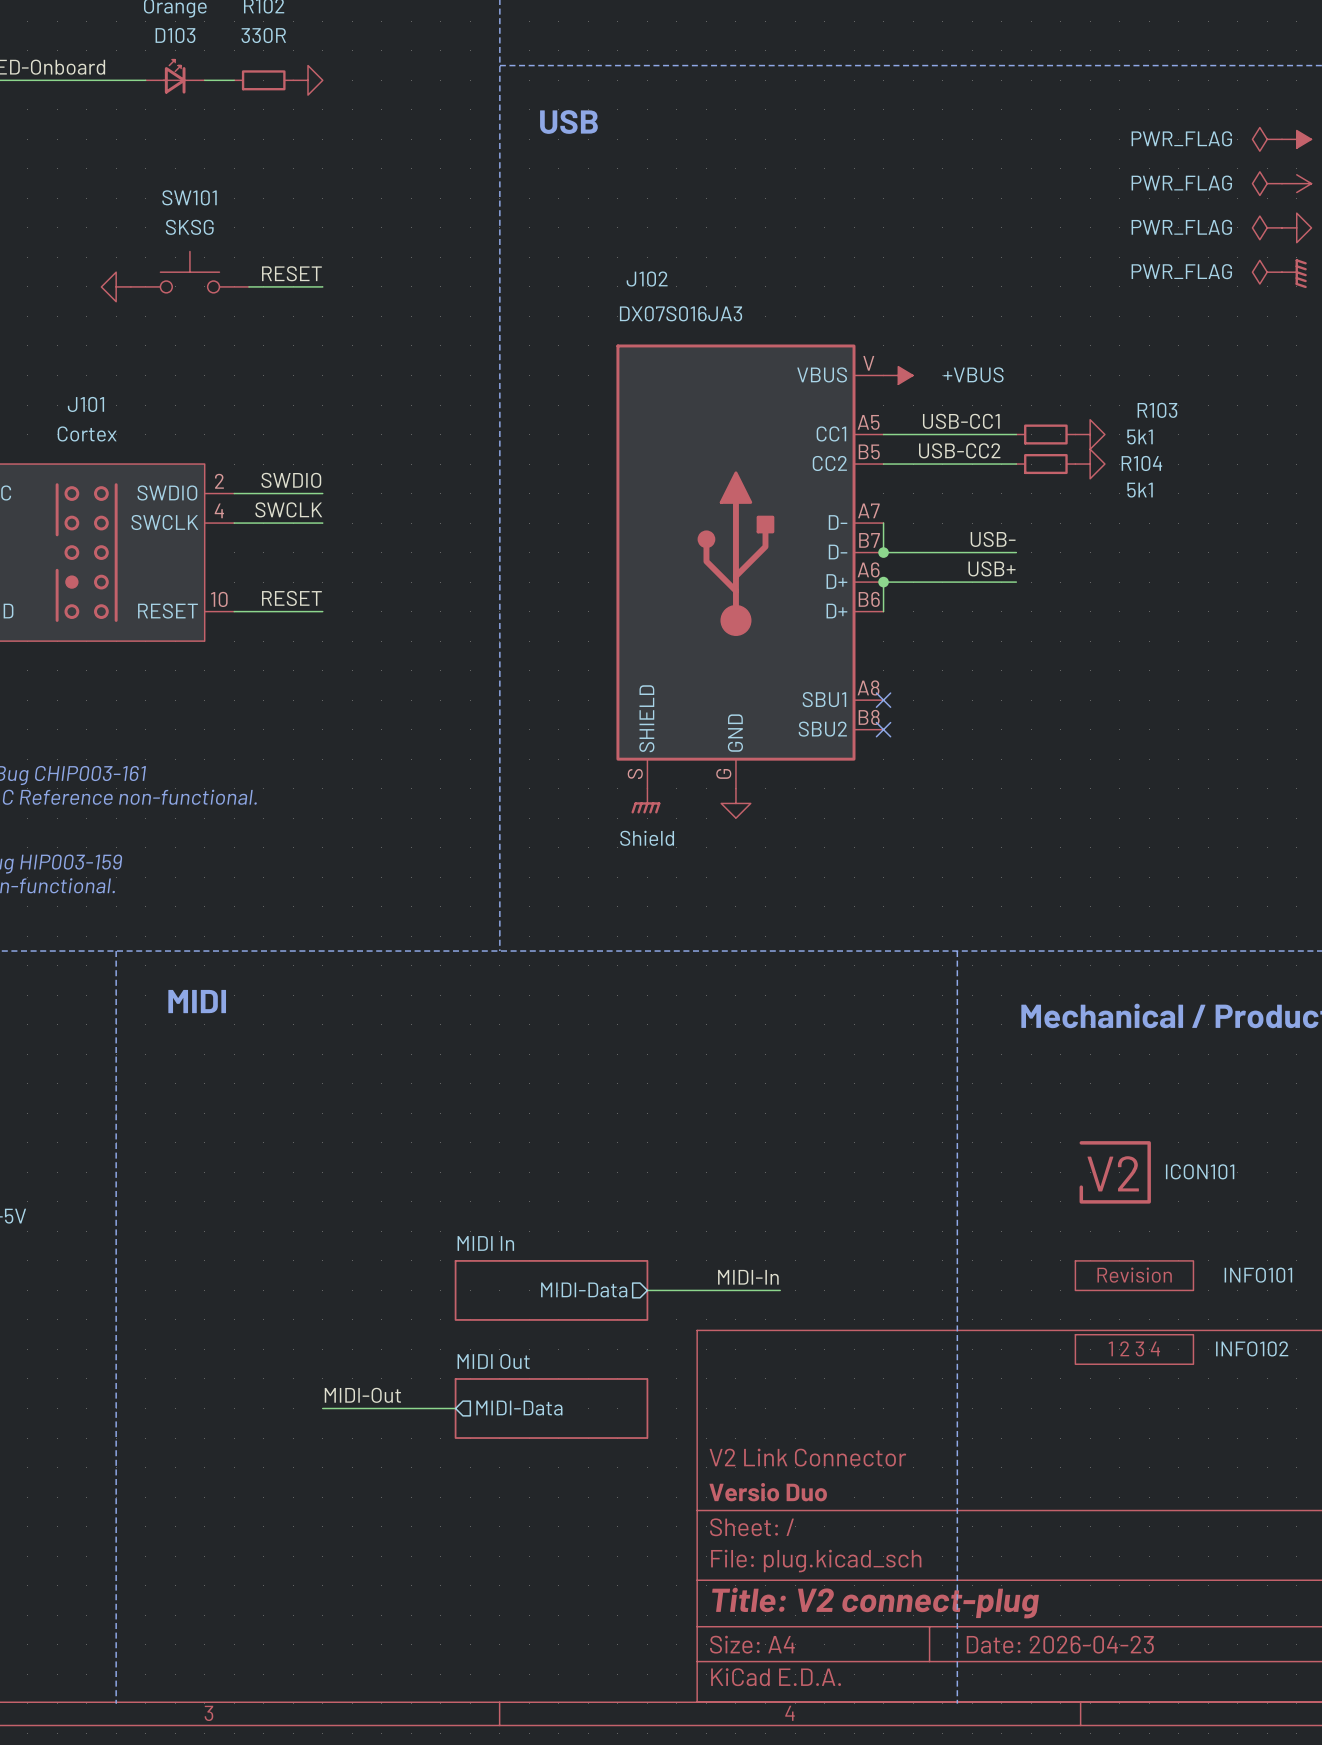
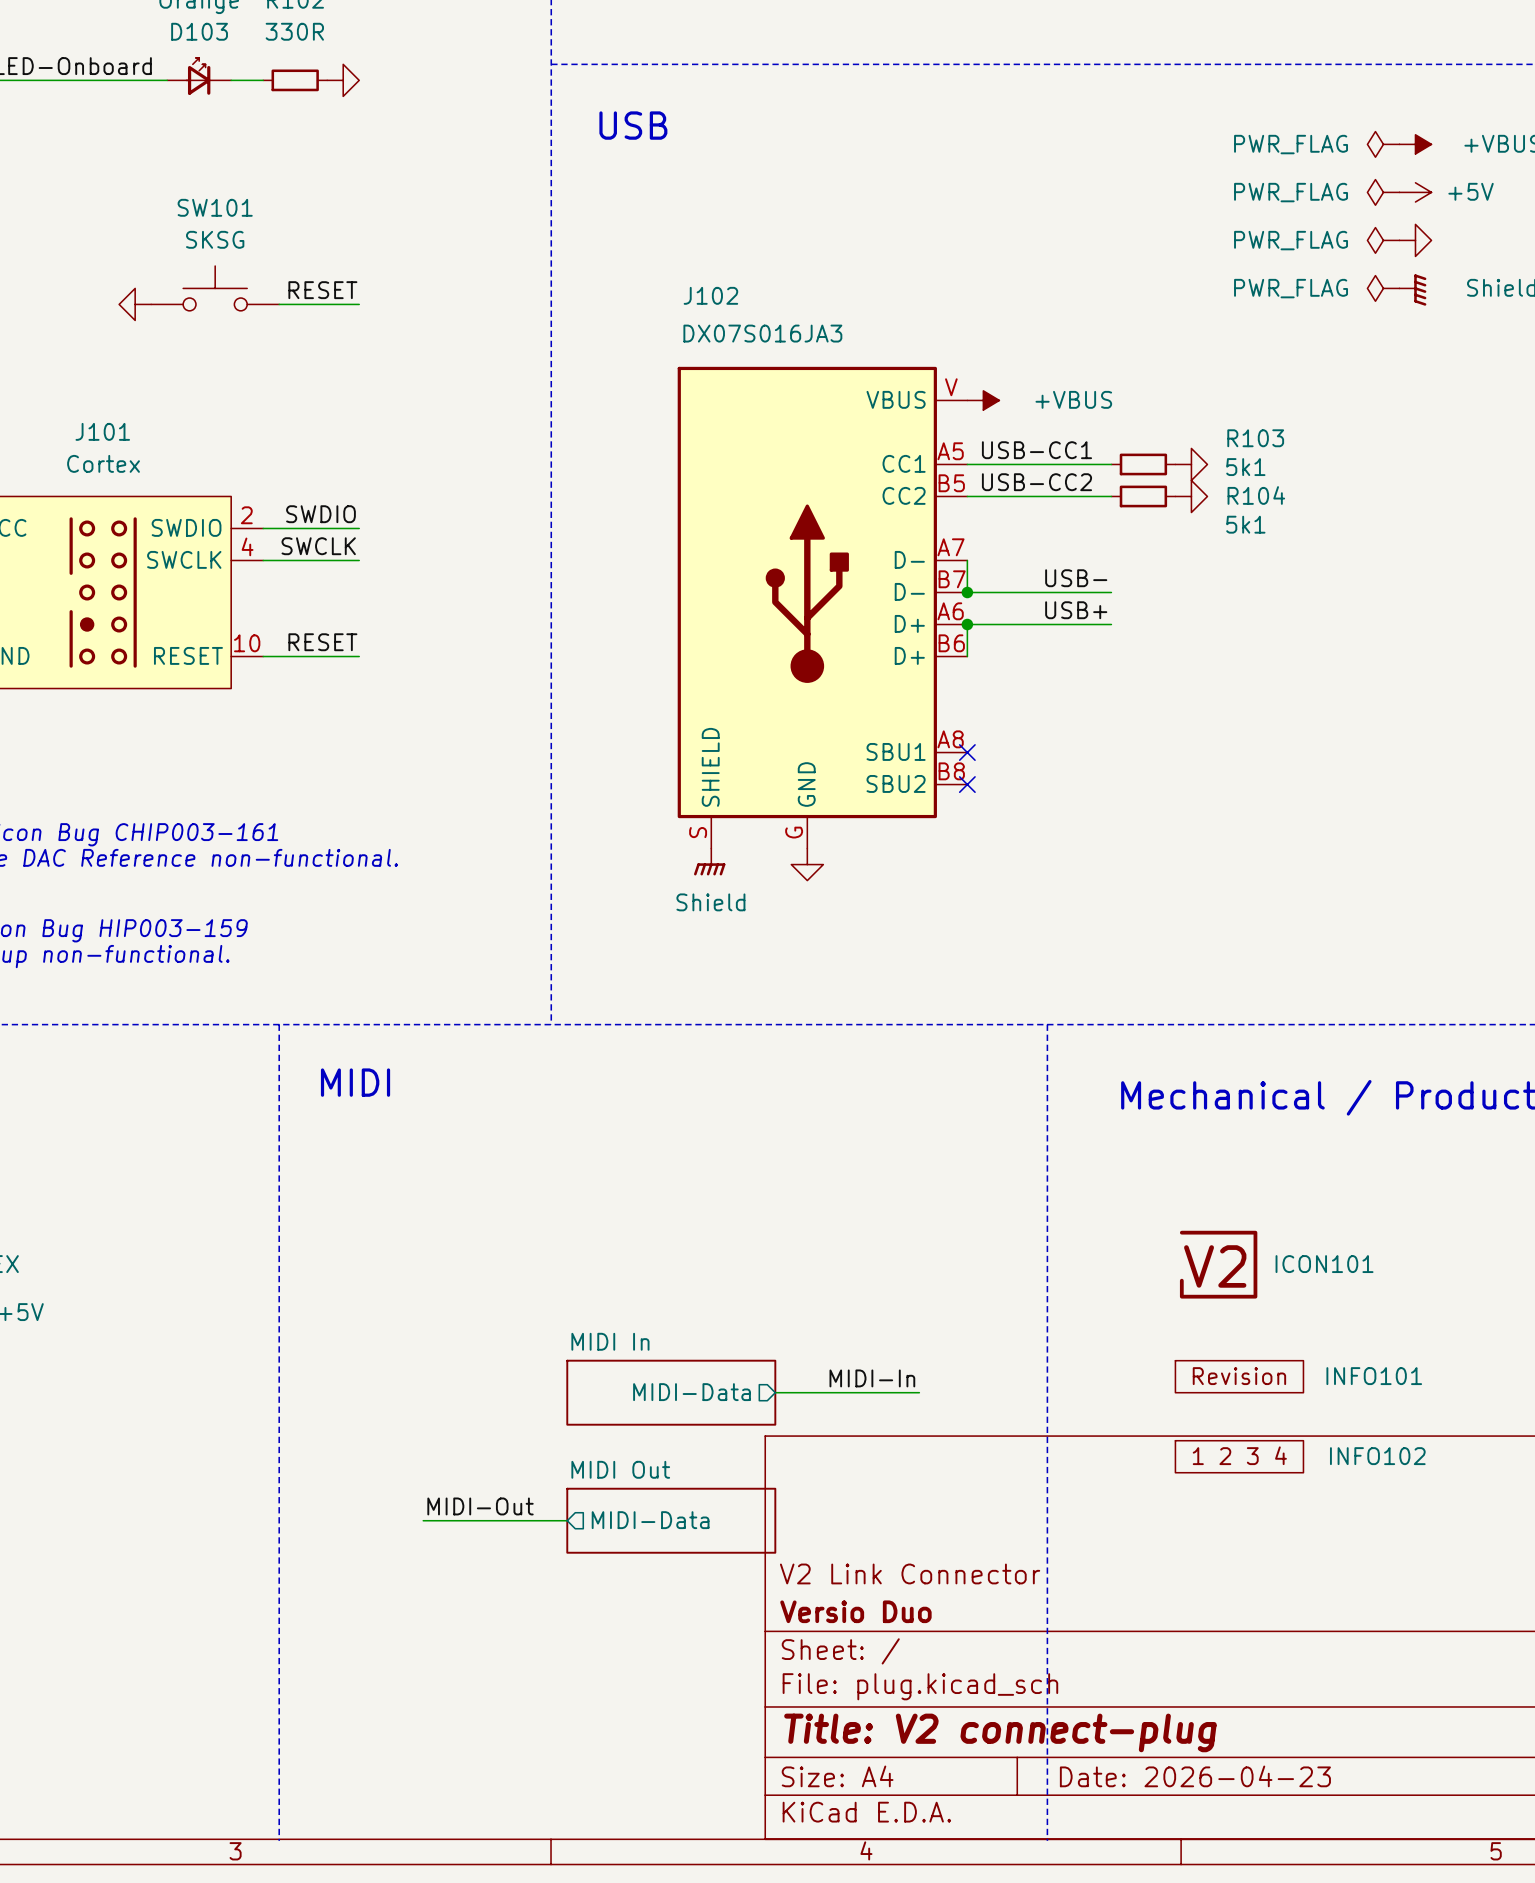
line: (116, 951) (116, 1703) -> (279, 1024) (279, 1840)
text position: MIDI (197, 1001) -> MIDI (355, 1082)
label position: MIDI-In (748, 1277) -> MIDI-In (872, 1378)
sheet pin position: MIDI-Data (584, 1289) -> MIDI-Data (692, 1392)
sheet MIDI In position: (551, 1290) -> (671, 1392)
wire: (647, 1290) (706, 1290) -> (855, 1392) (919, 1392)
label position: MIDI-Out (362, 1395) -> MIDI-Out (480, 1506)
wire: (322, 1408) (381, 1408) -> (503, 1520) (567, 1520)
sheet pin position: MIDI-Data (519, 1408) -> MIDI-Data (650, 1520)
sheet MIDI Out position: (551, 1408) -> (671, 1520)

